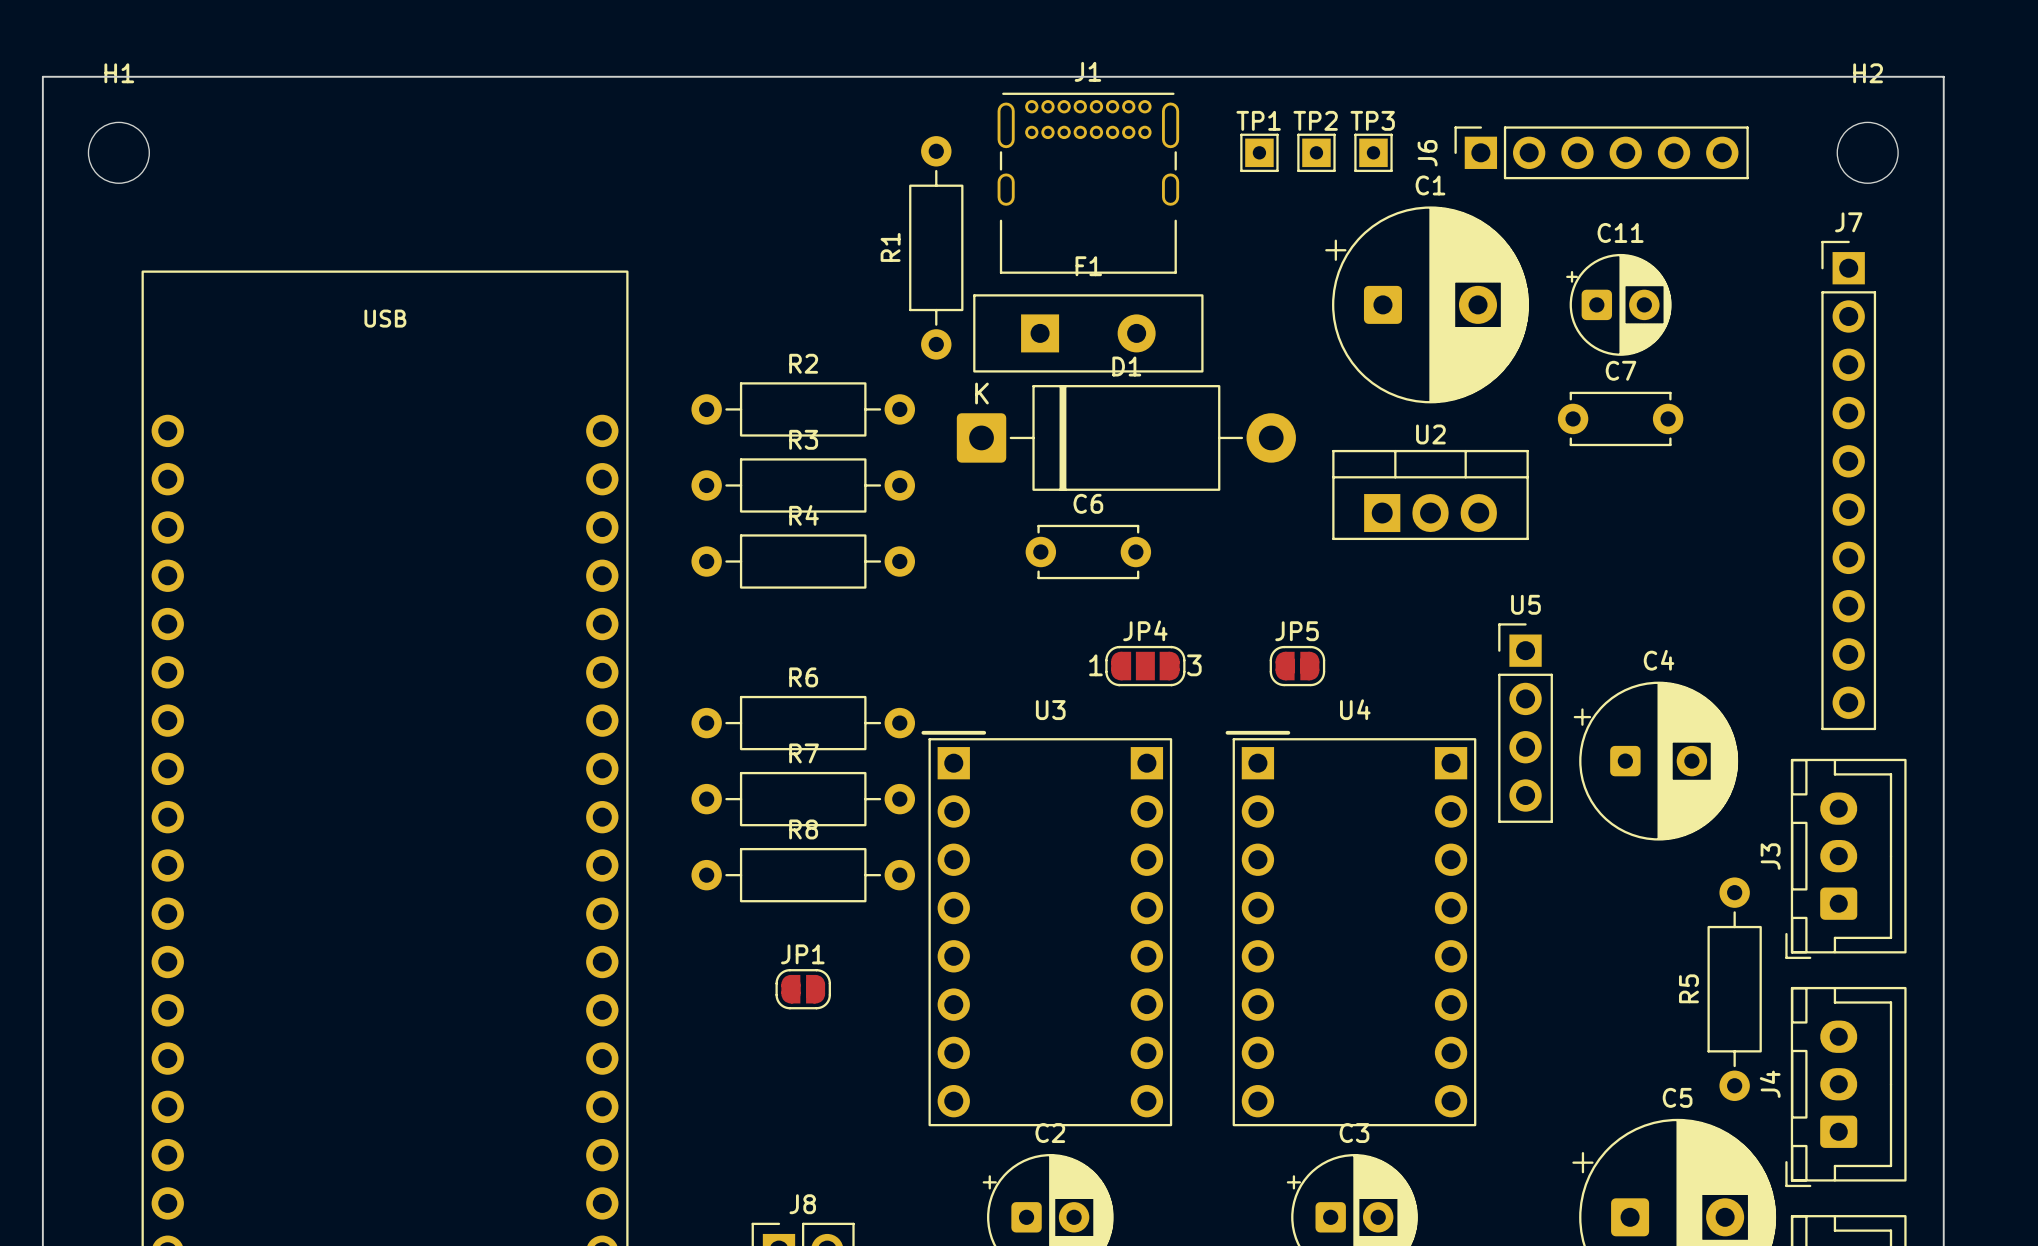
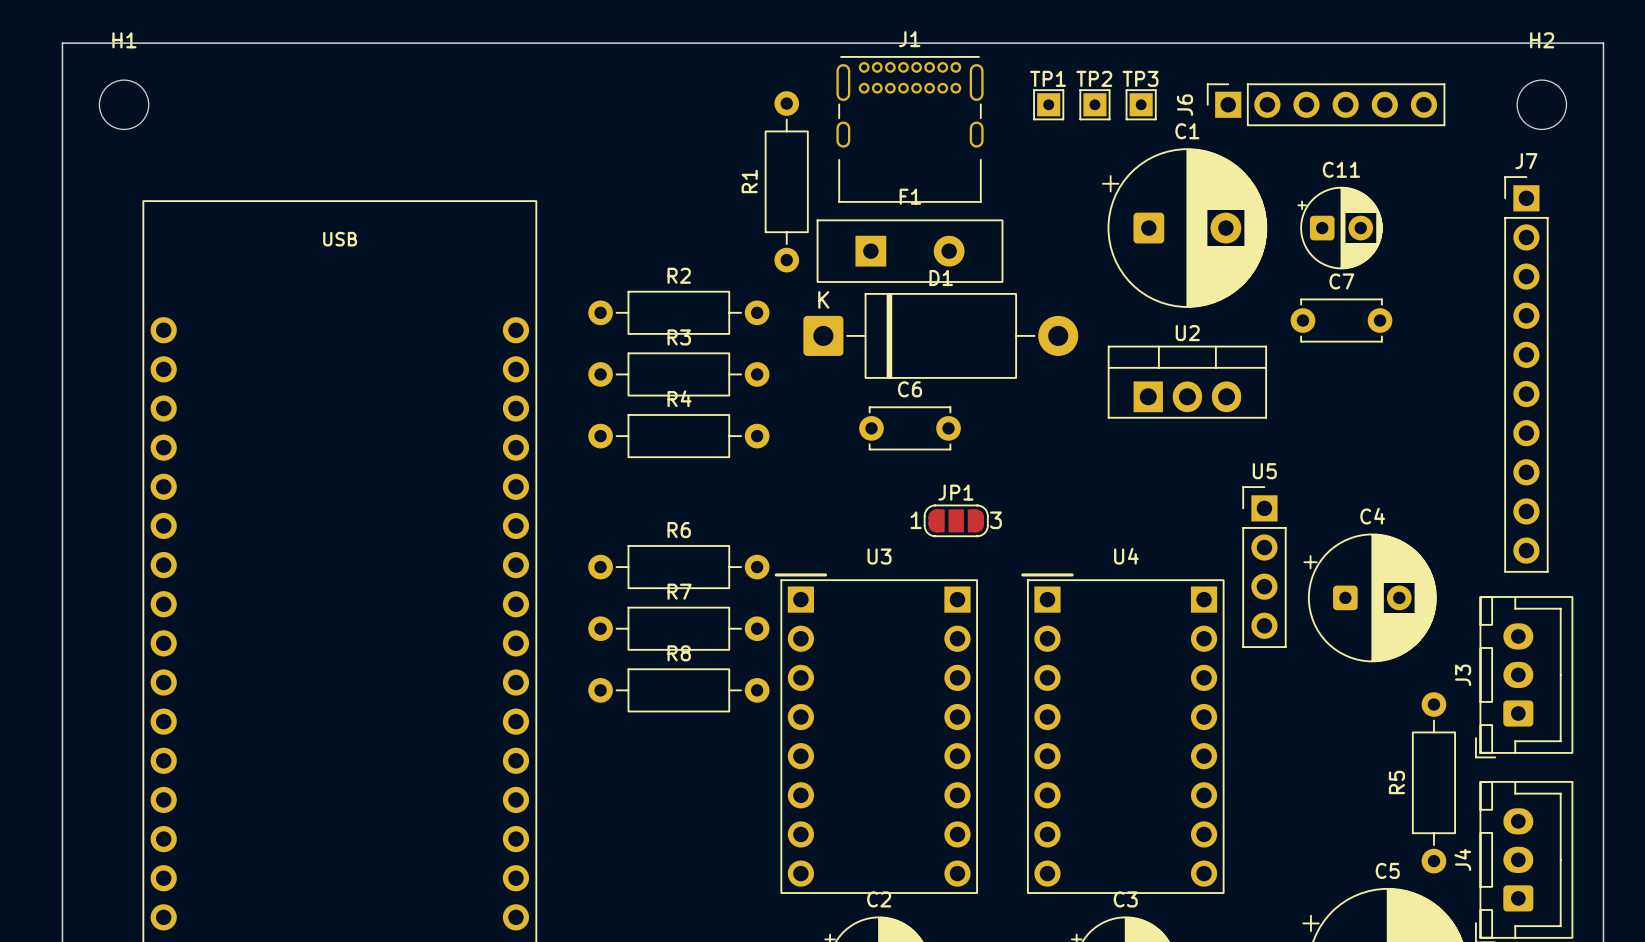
JP4 name: JP4 (1145, 630) -> JP1 (955, 492)
JP5: (1297, 666) -> none
JP1: (803, 989) -> none

